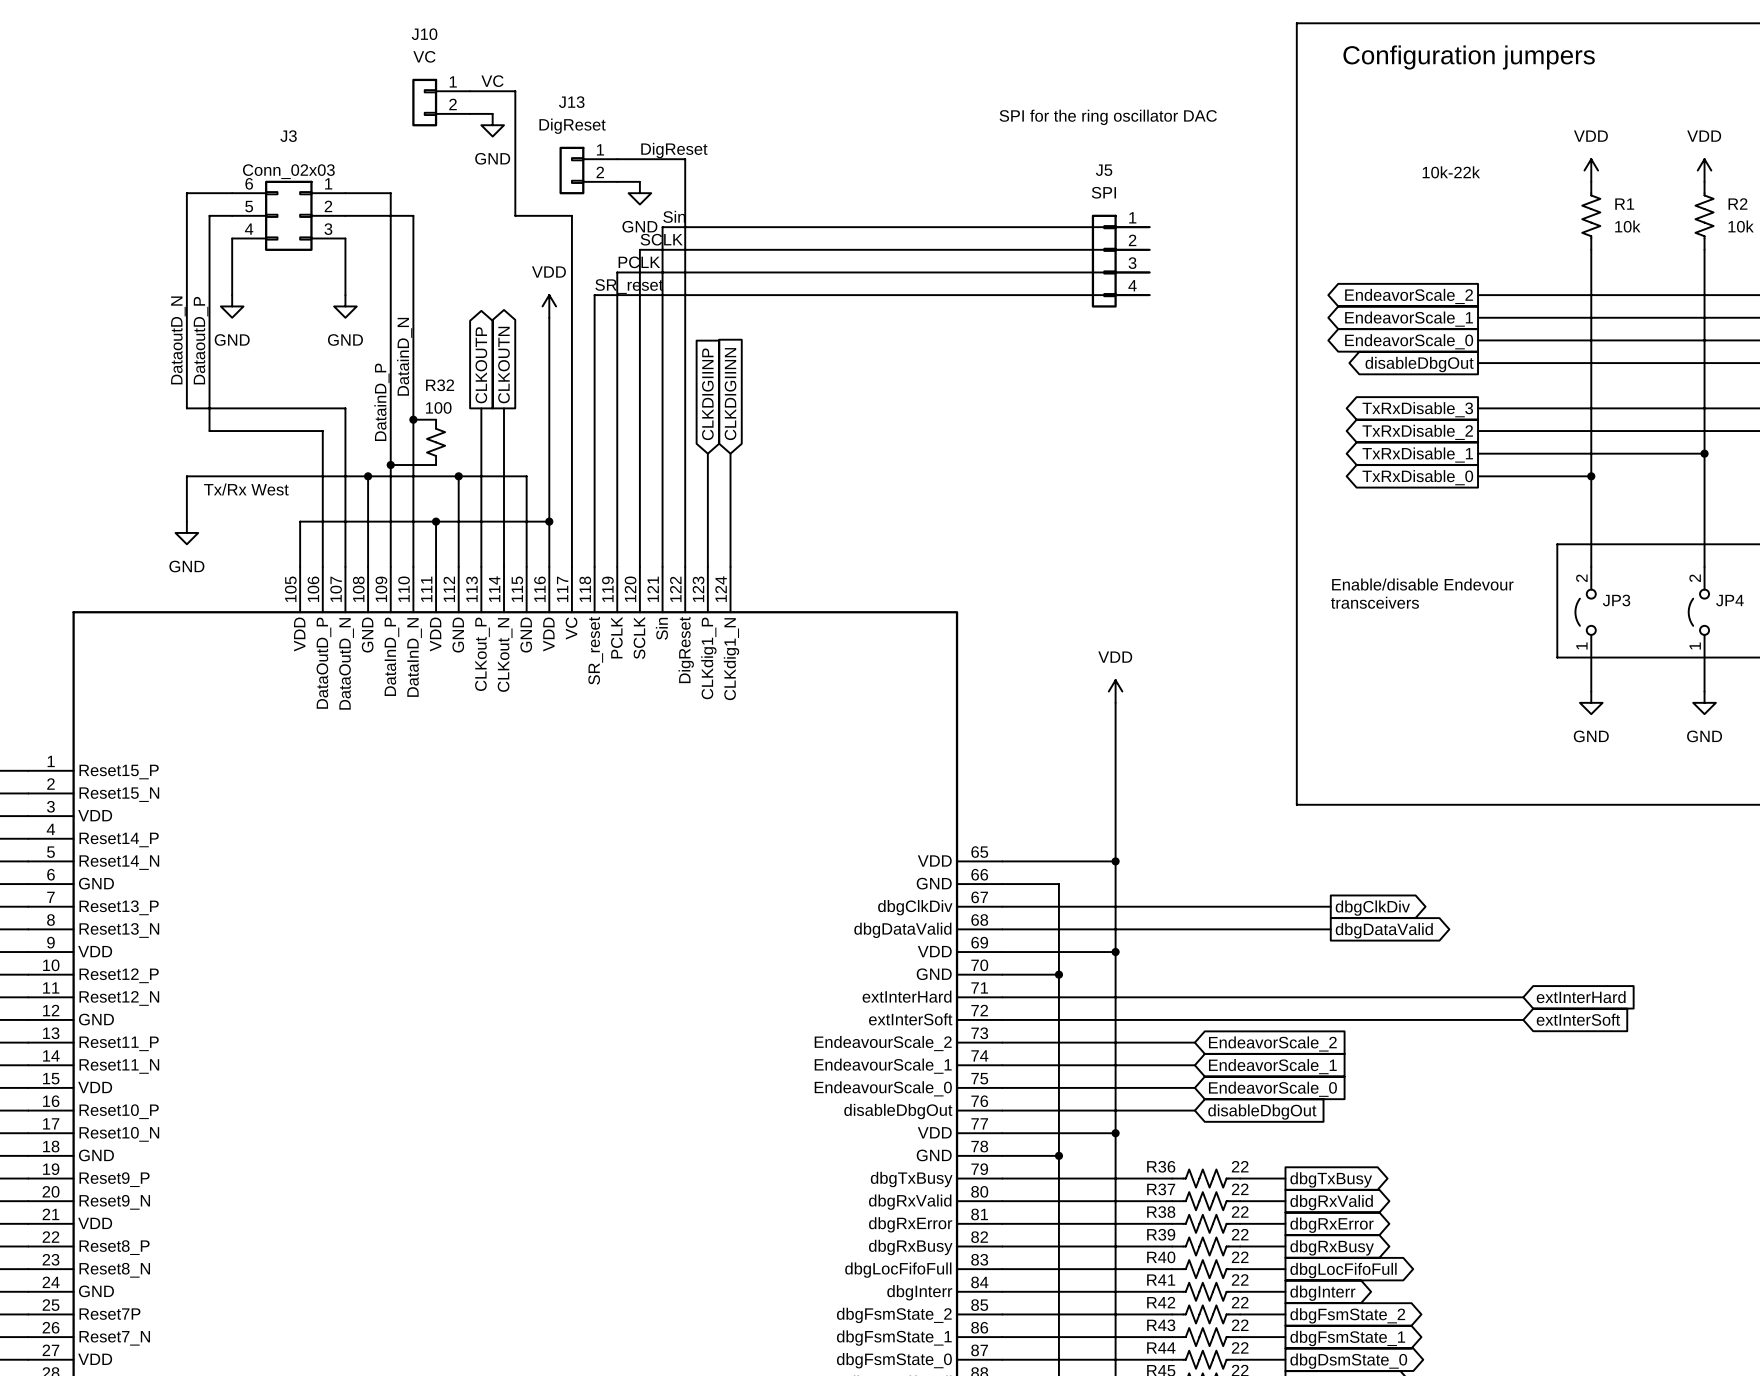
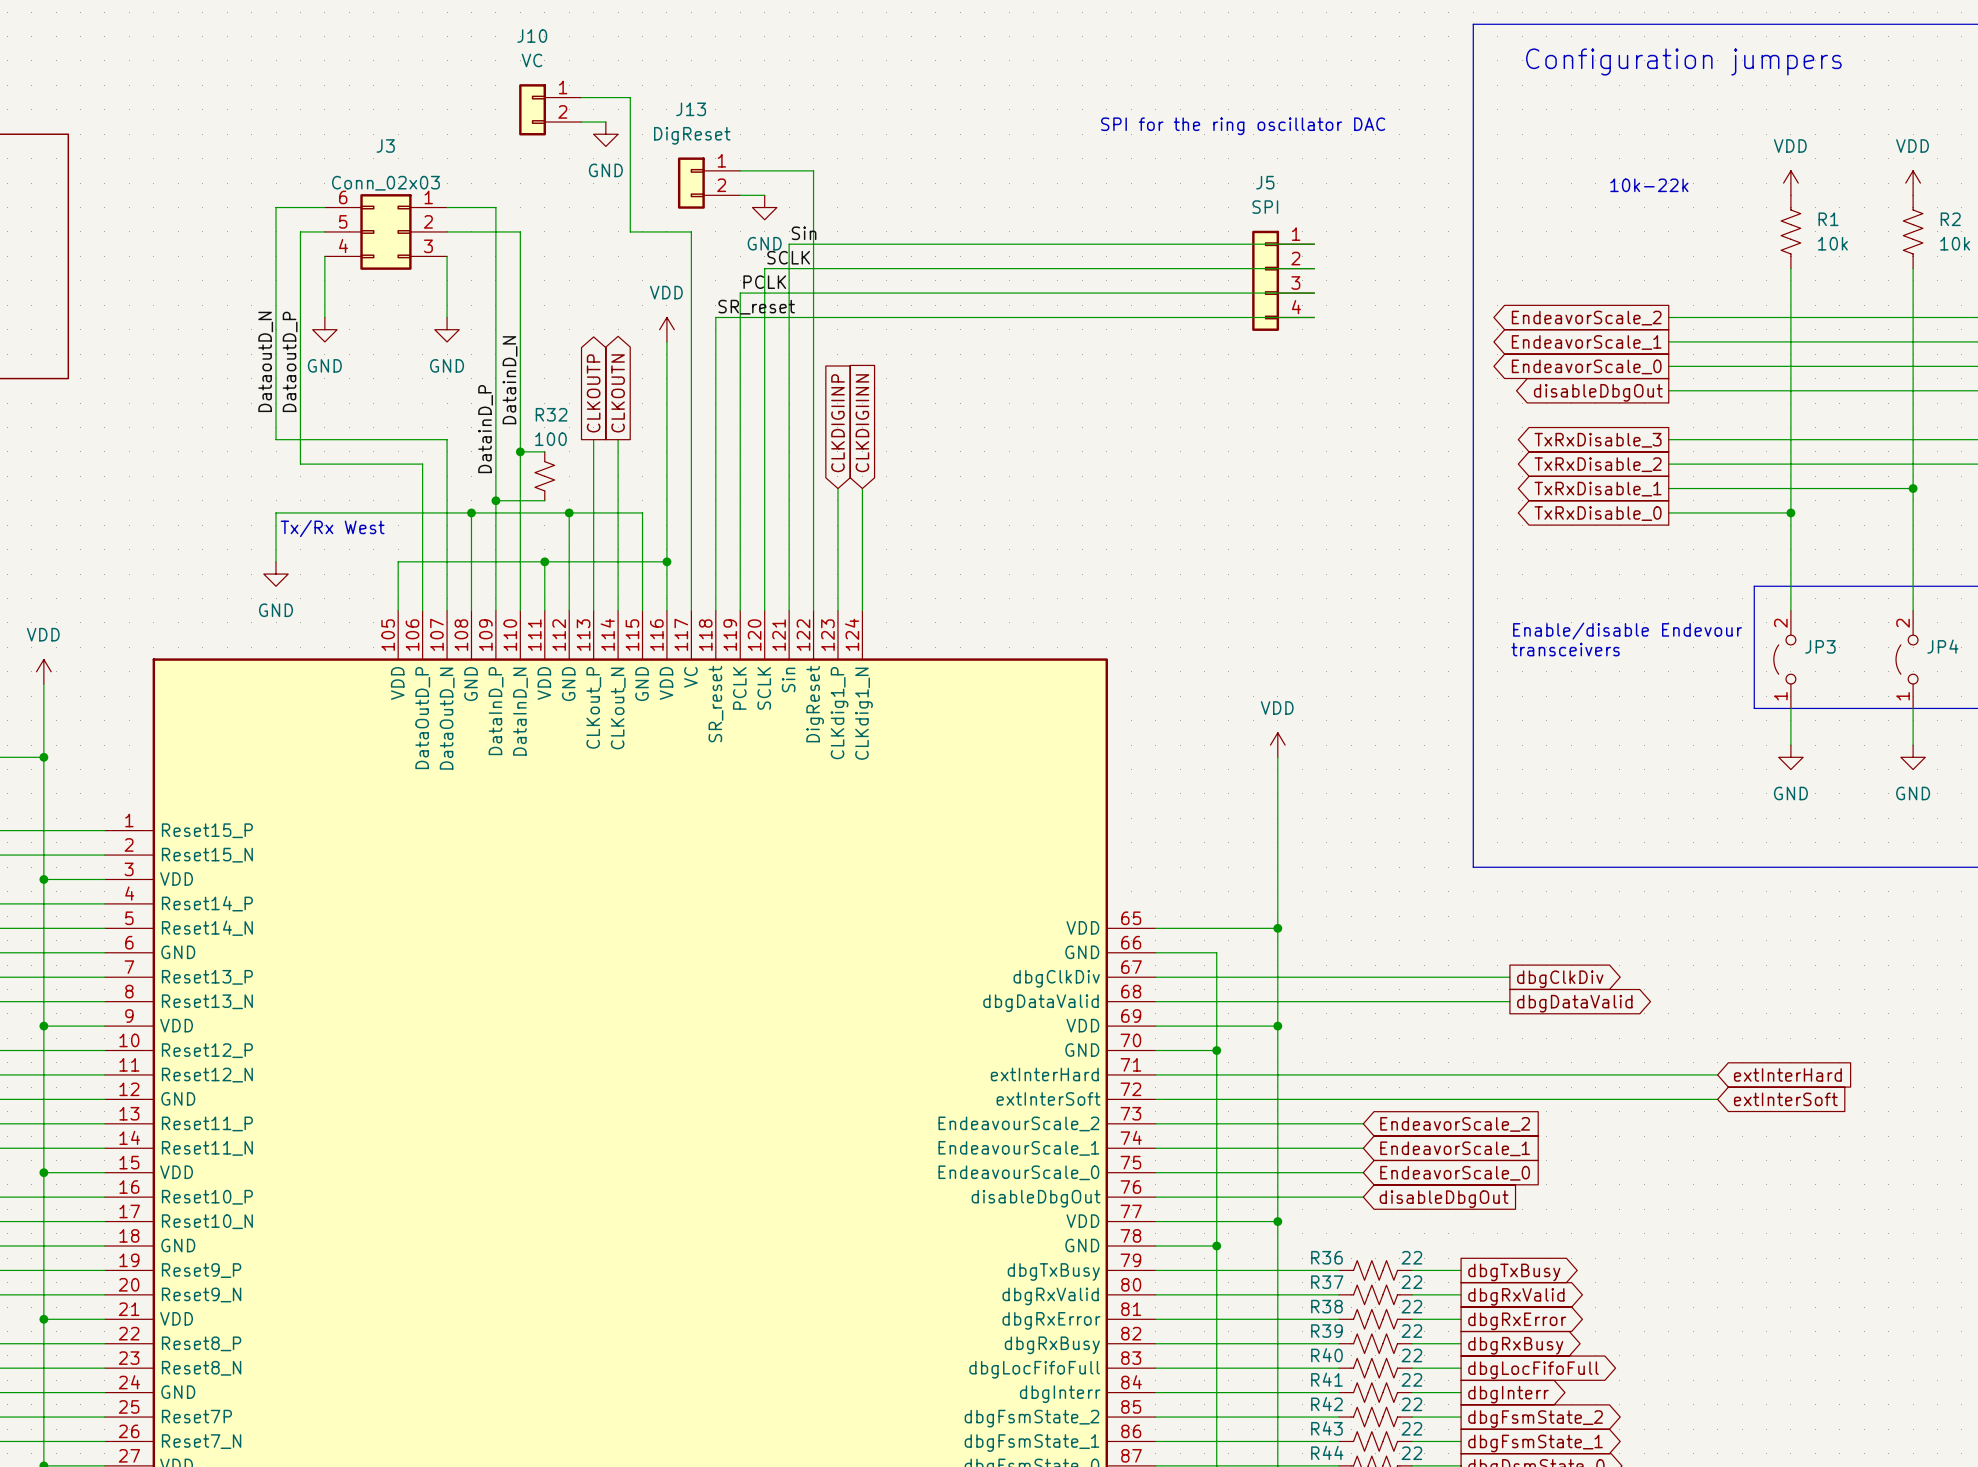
label: VC (492, 81) -> none
label: DigReset (674, 150) -> none

